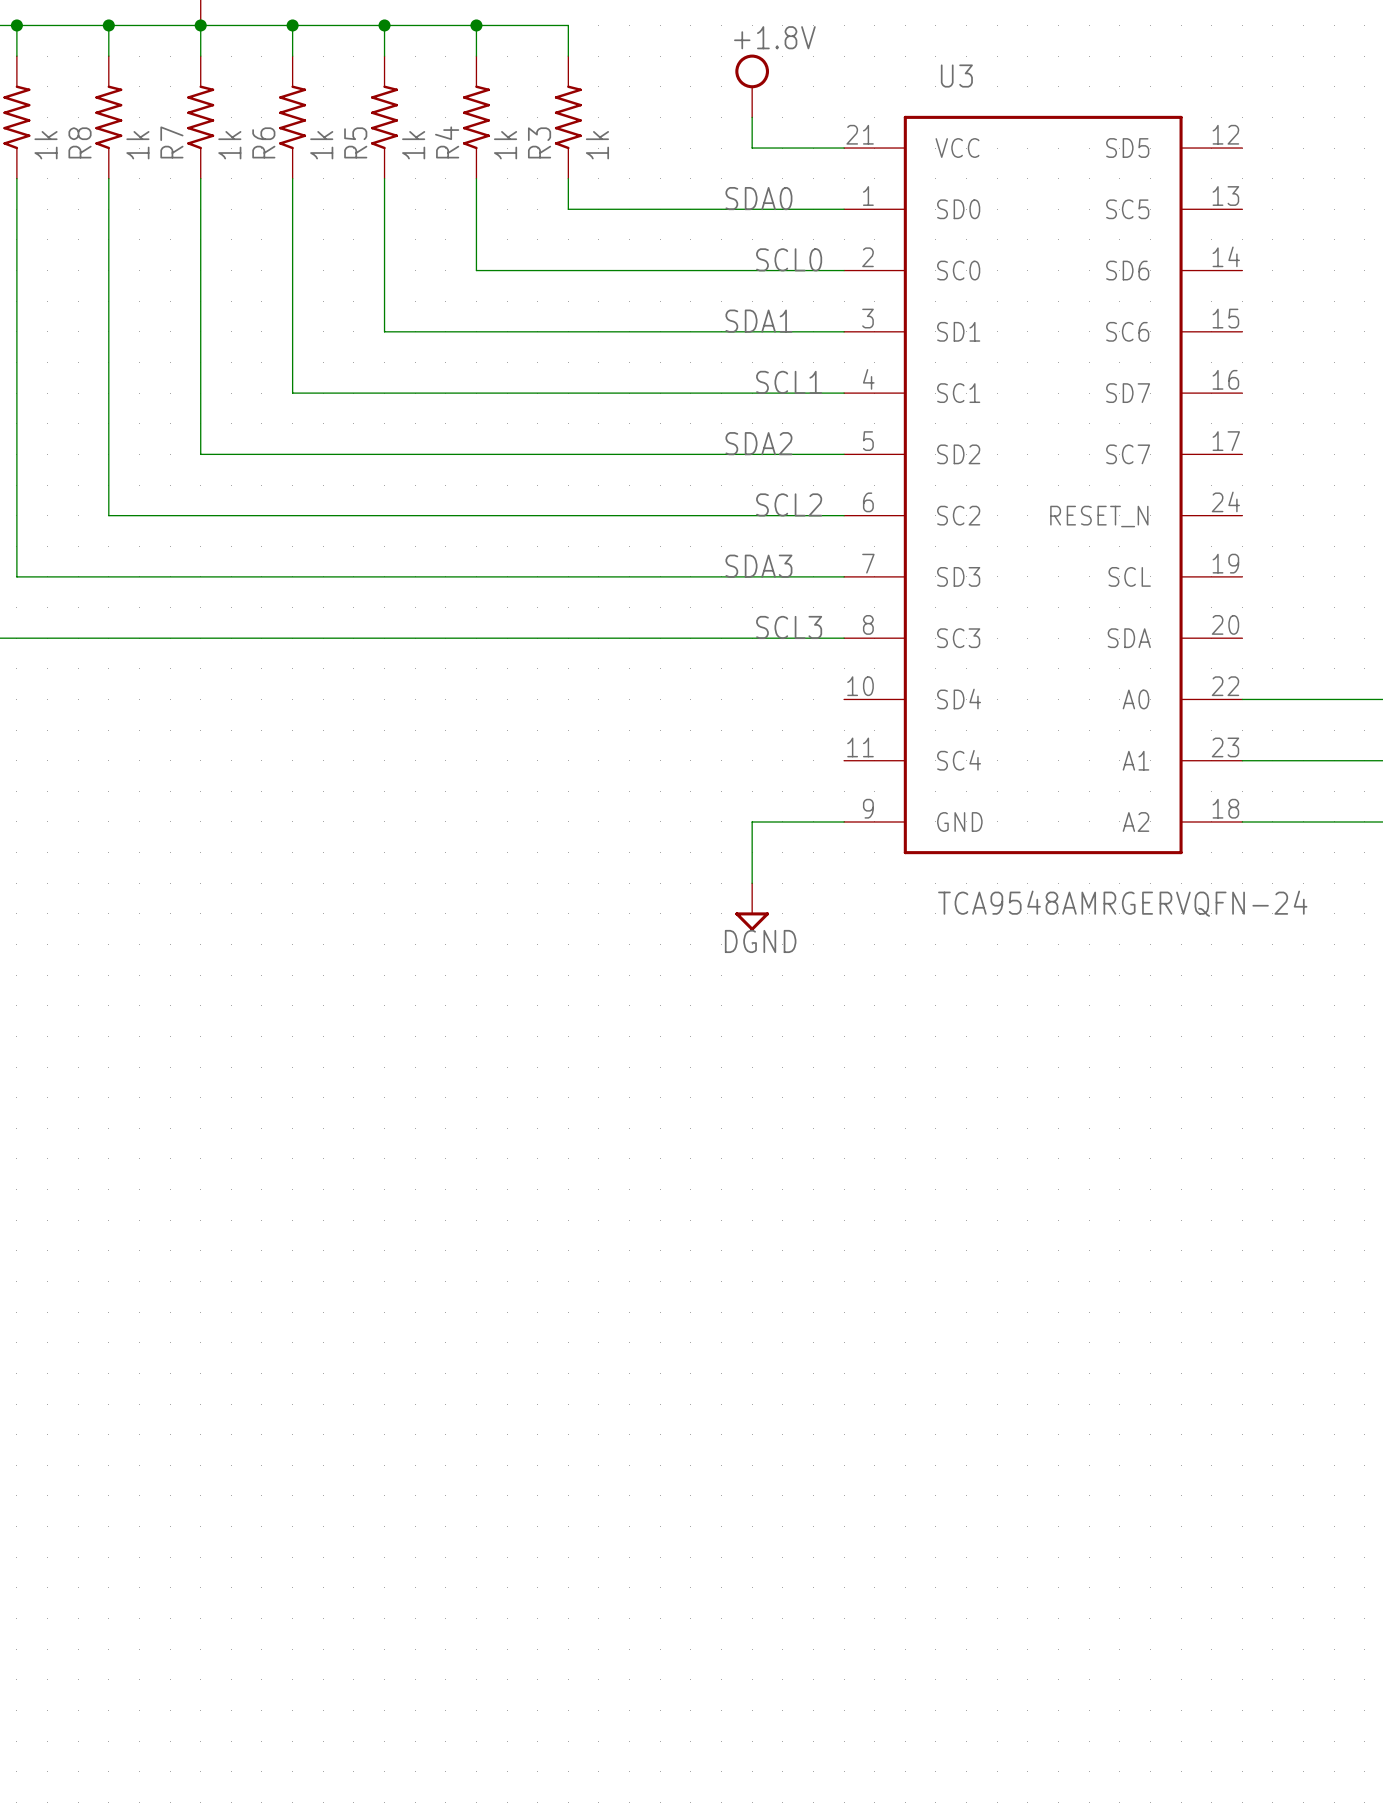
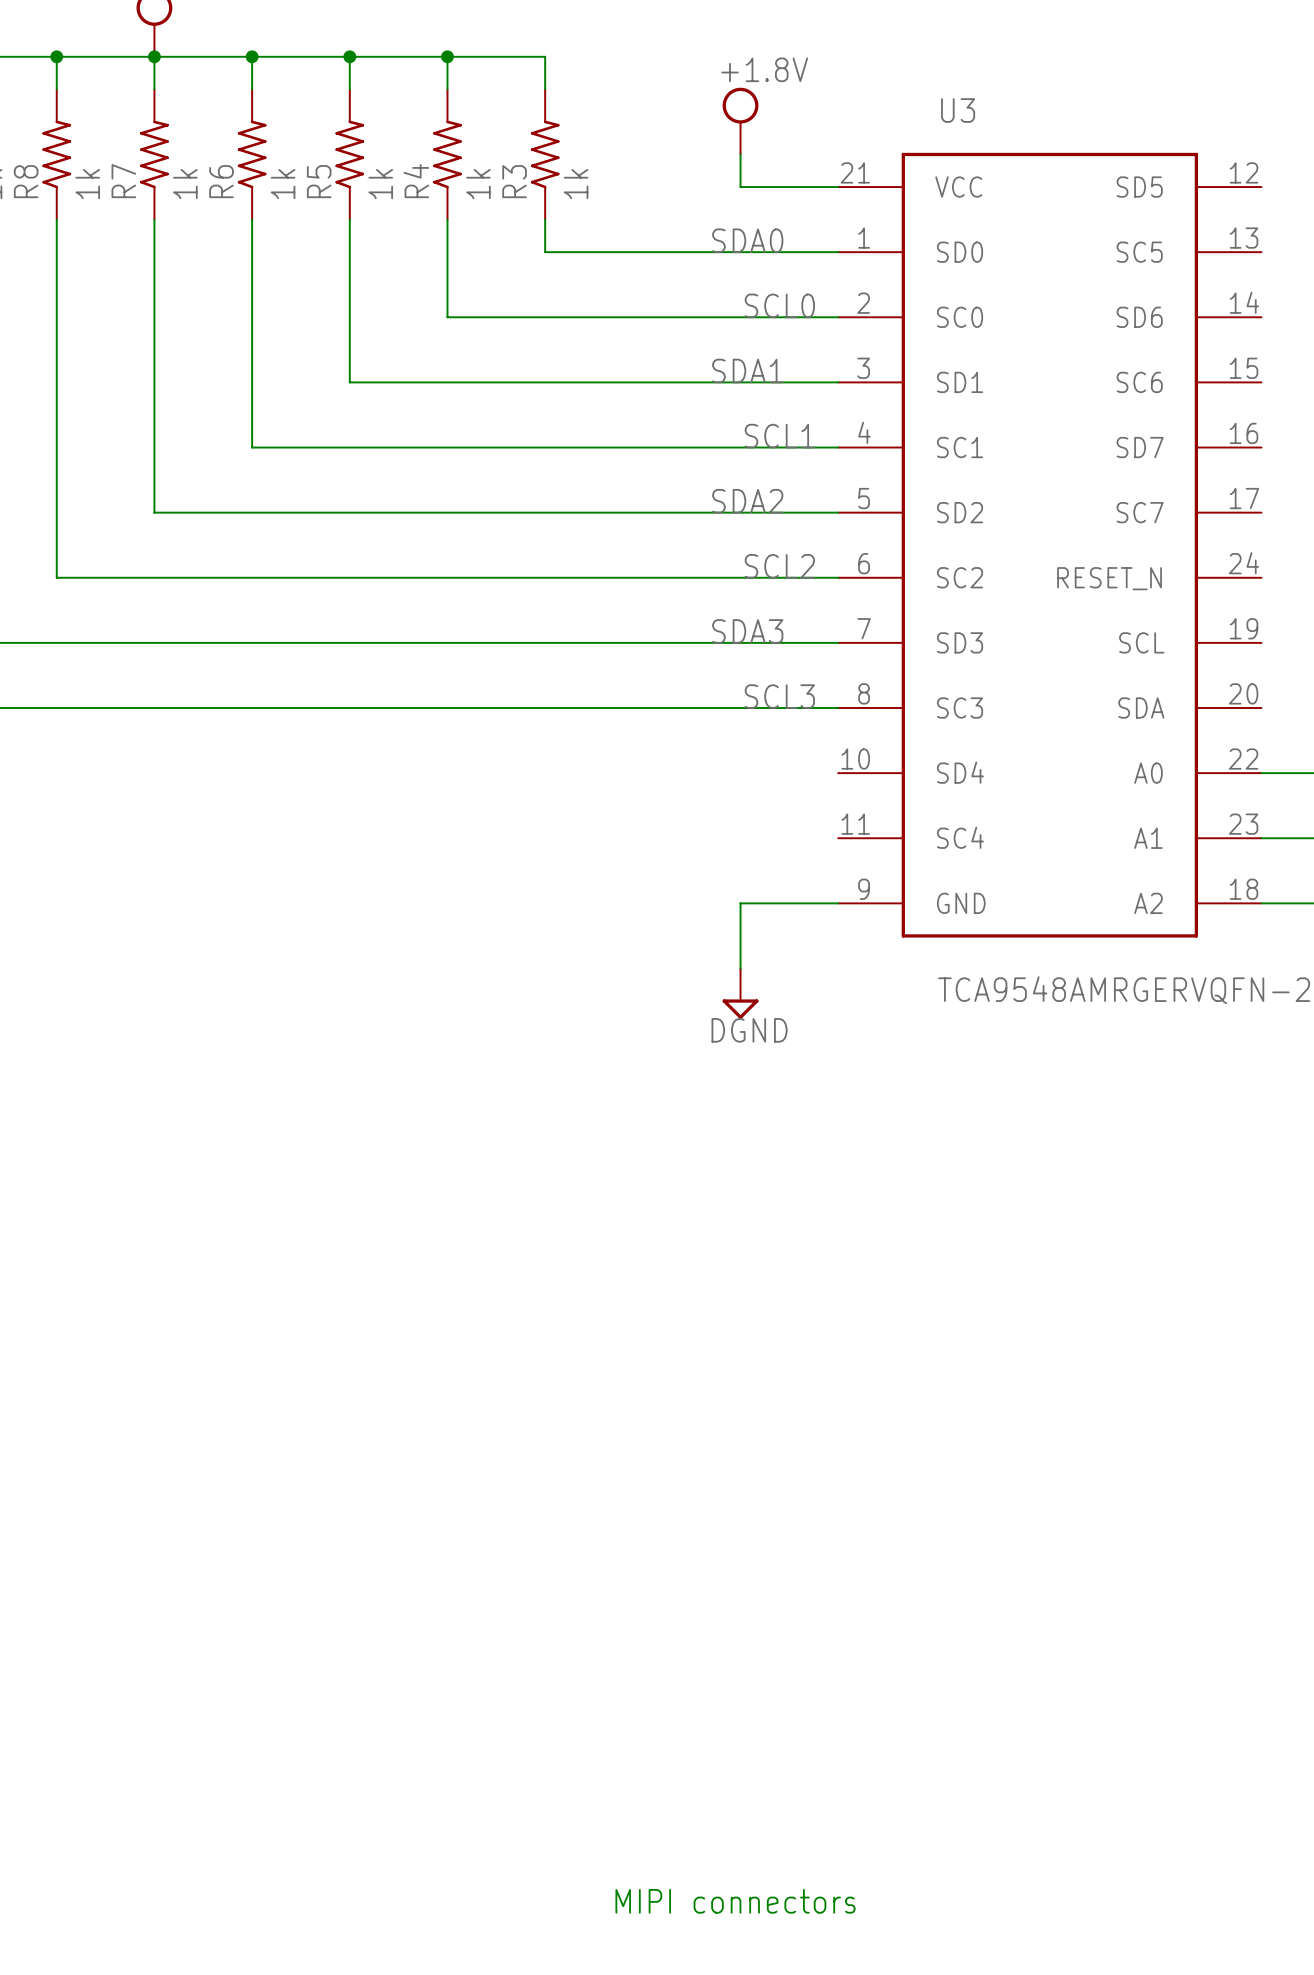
text: none -> MIPI connectors (735, 1901)

